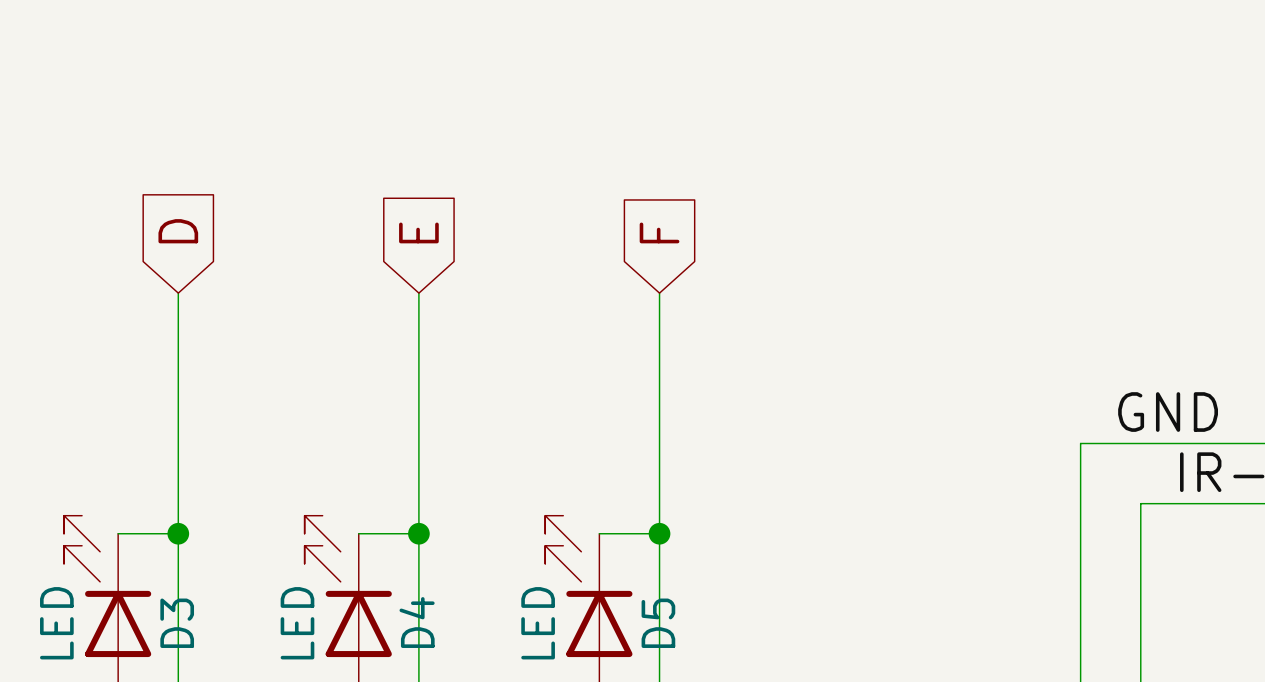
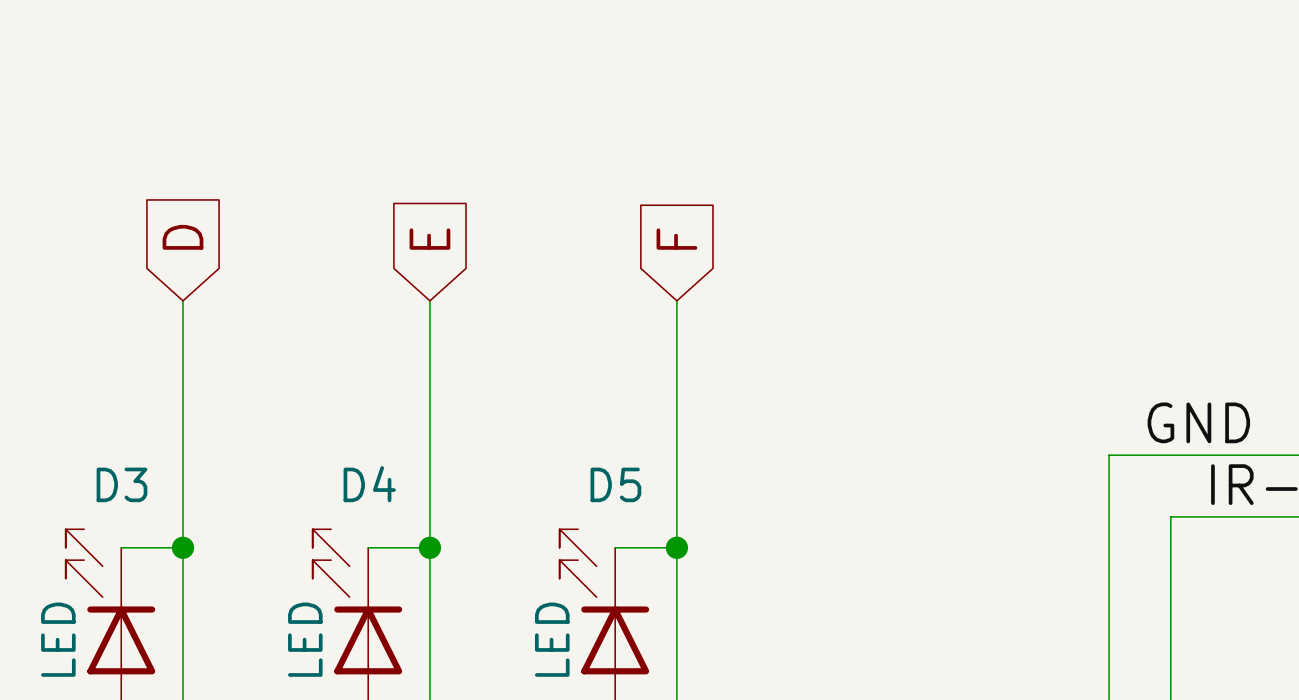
D4 name rotation: 0° (417, 622) -> 90° clockwise (369, 484)
D4 name position: D4 (417, 622) -> D4 (369, 484)
D3 name rotation: 0° (177, 623) -> 90° clockwise (121, 484)
D3 name position: D3 (177, 623) -> D3 (121, 484)
D5 name rotation: 0° (658, 623) -> 90° clockwise (615, 484)
D5 name position: D5 (658, 623) -> D5 (615, 484)

